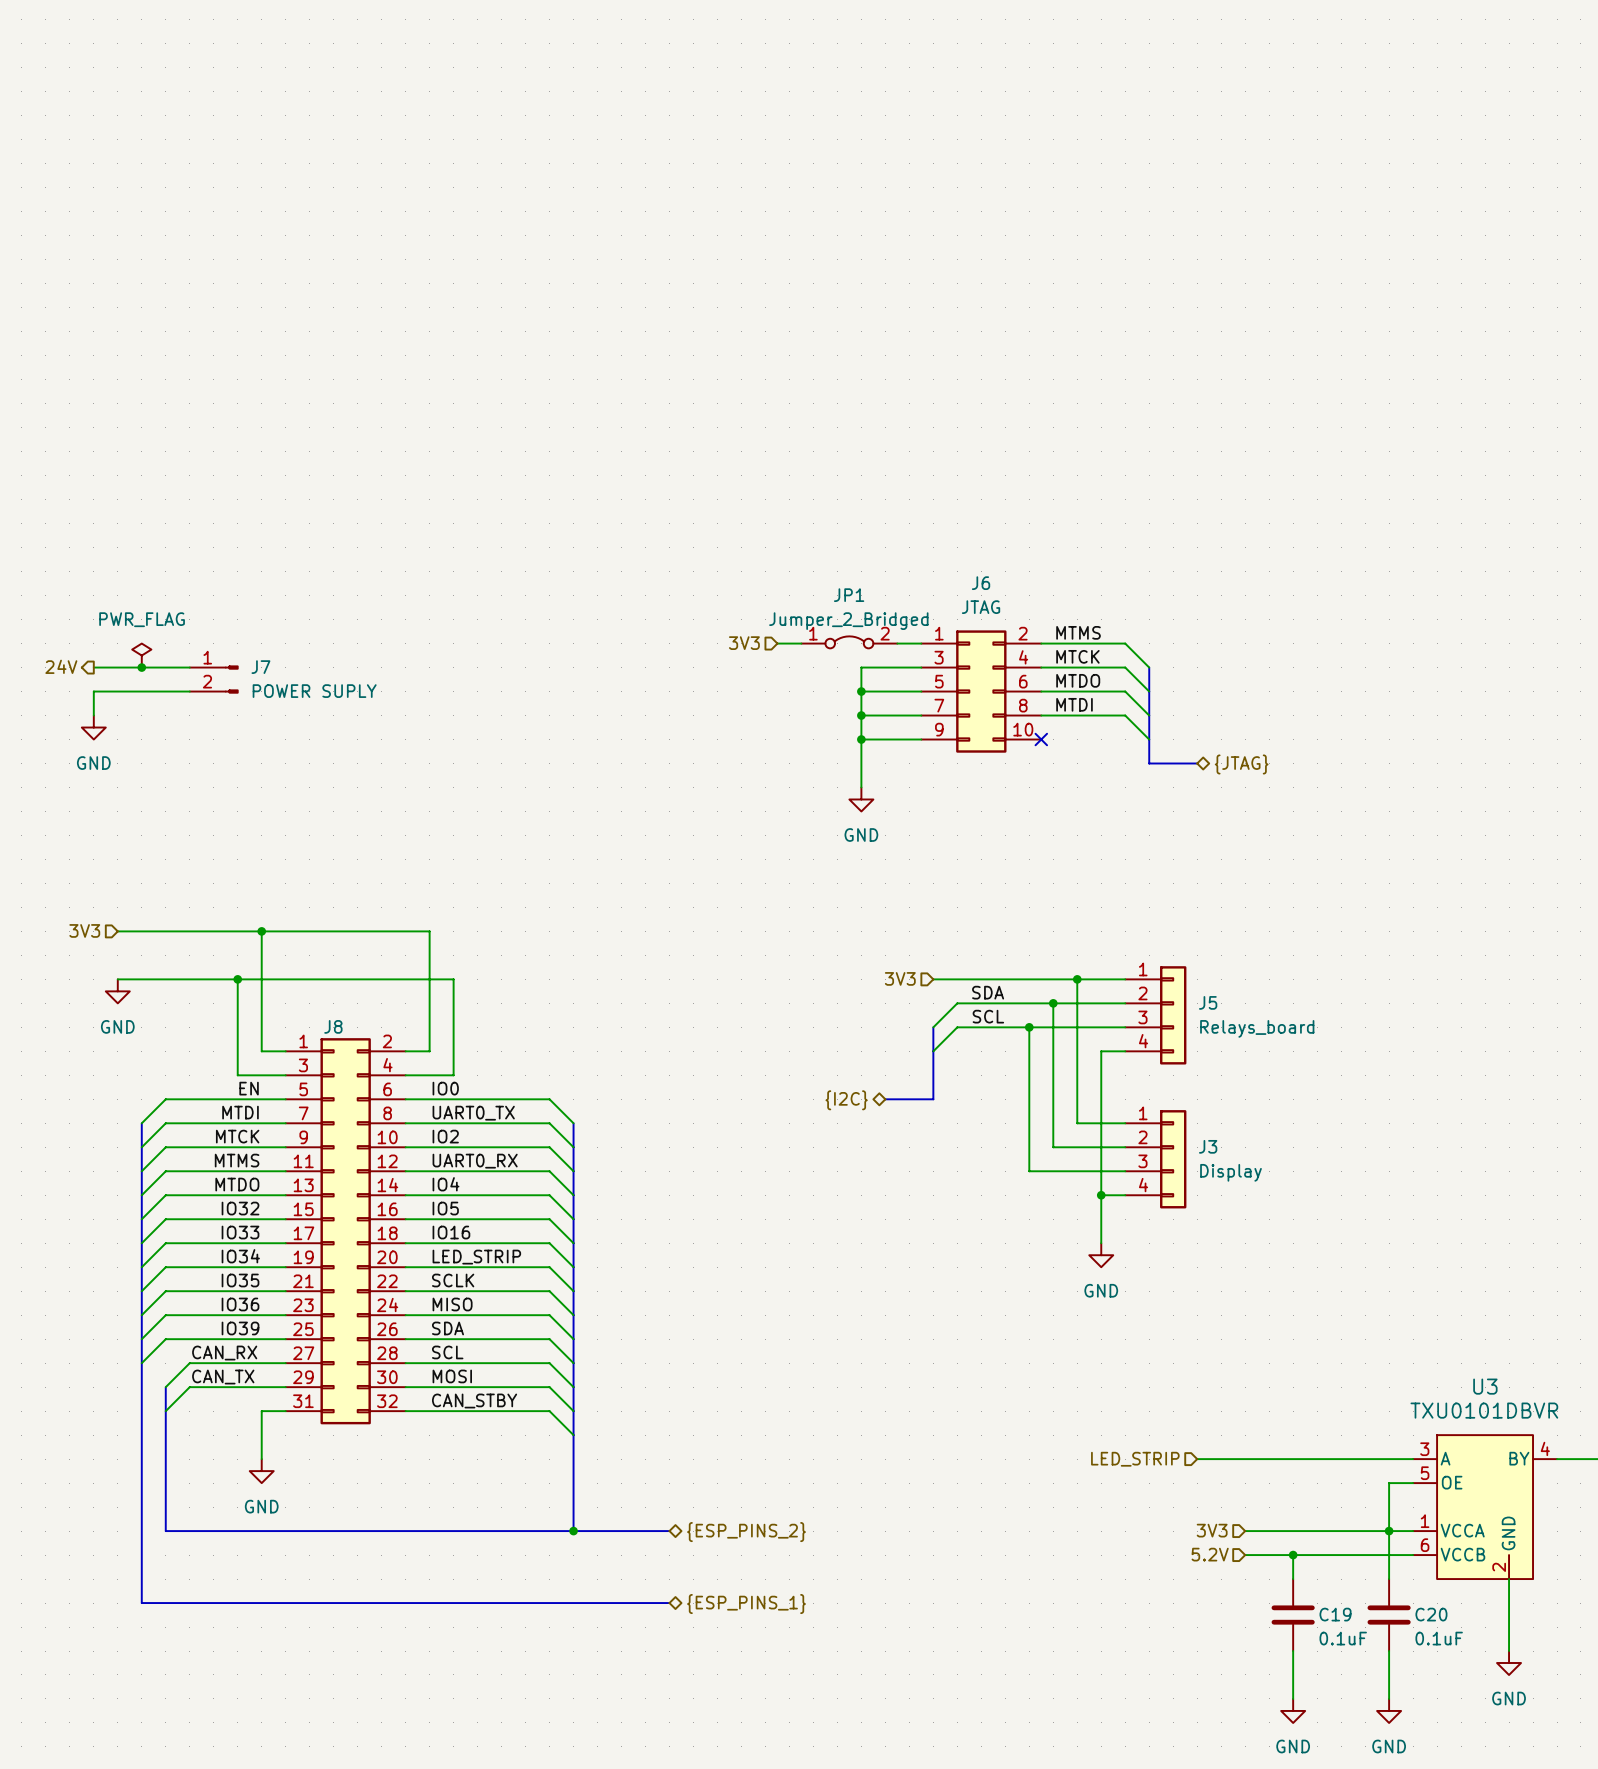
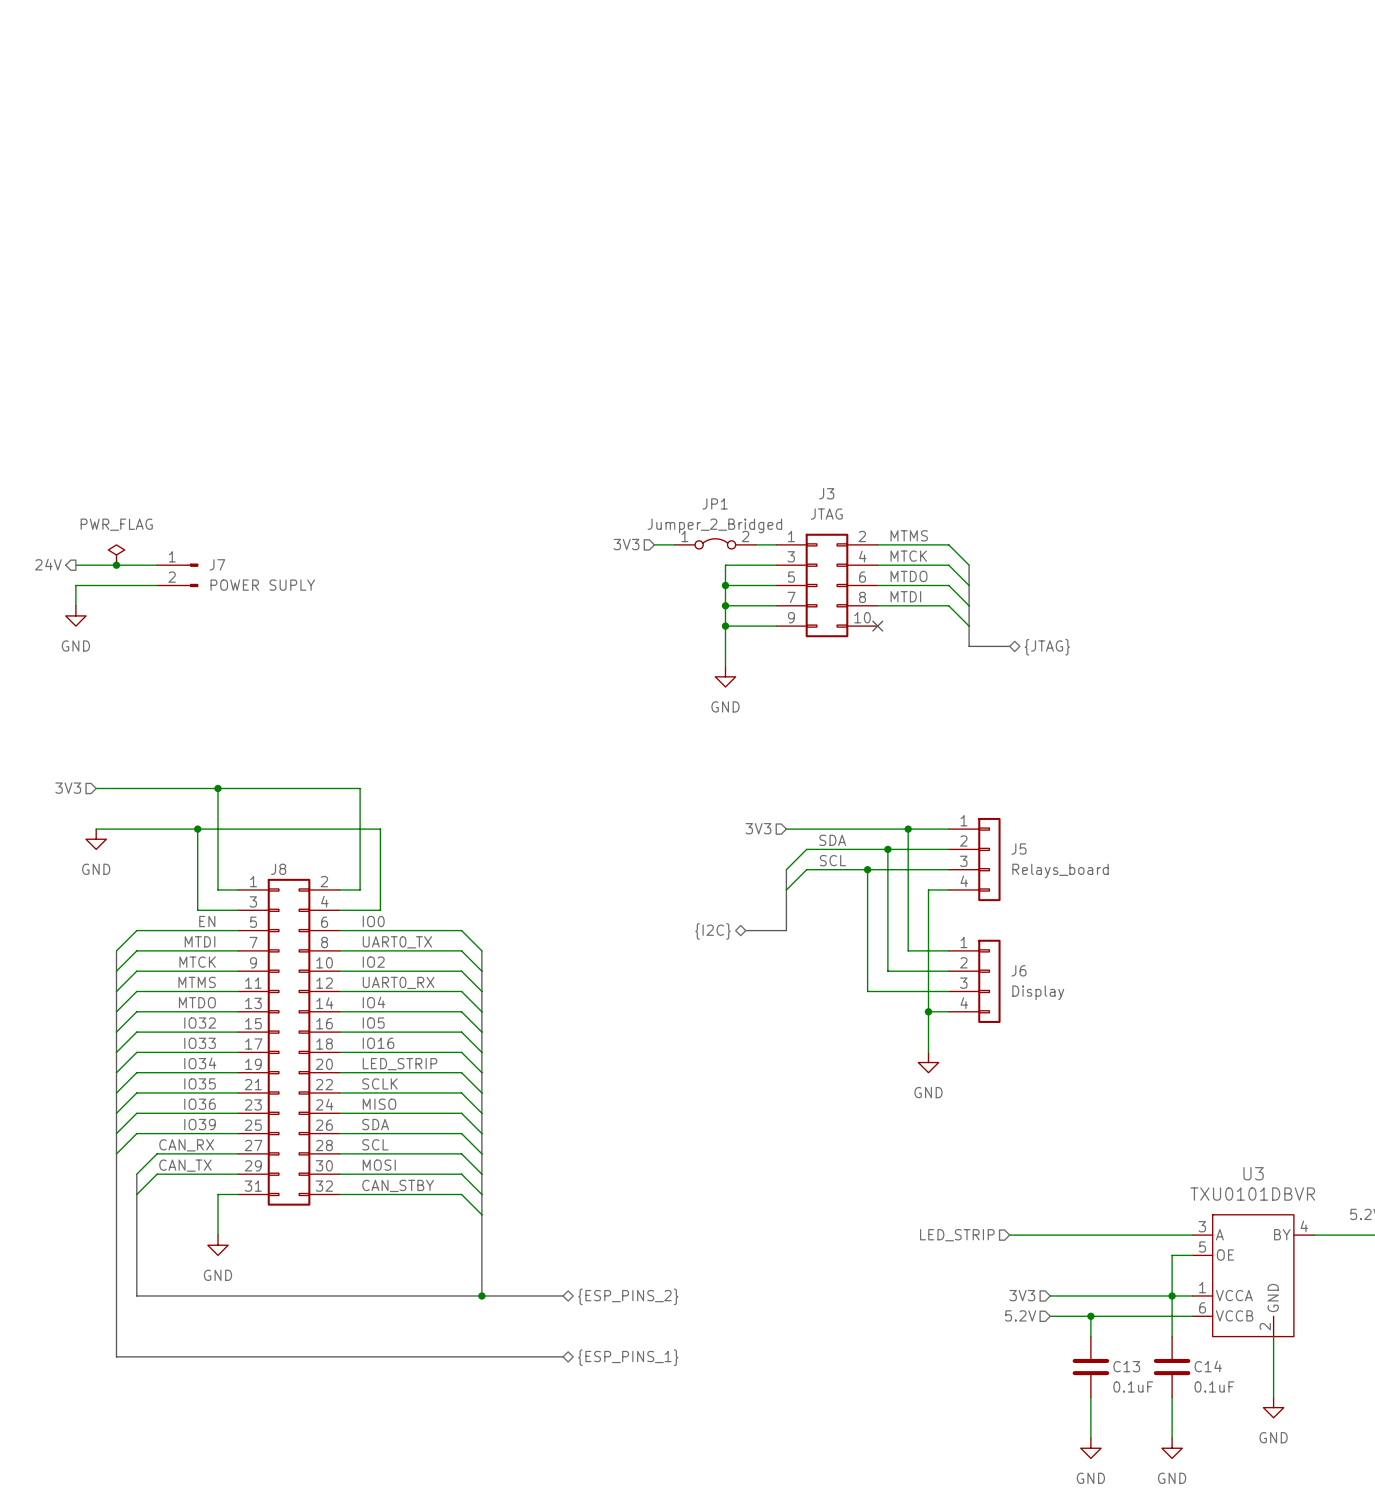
J6 name: J6 (981, 583) -> J3 (826, 493)
J3 name: J3 (1208, 1146) -> J6 (1018, 970)
C19 name: C19 (1335, 1614) -> C13 (1126, 1366)
C20 name: C20 (1431, 1614) -> C14 (1208, 1366)

